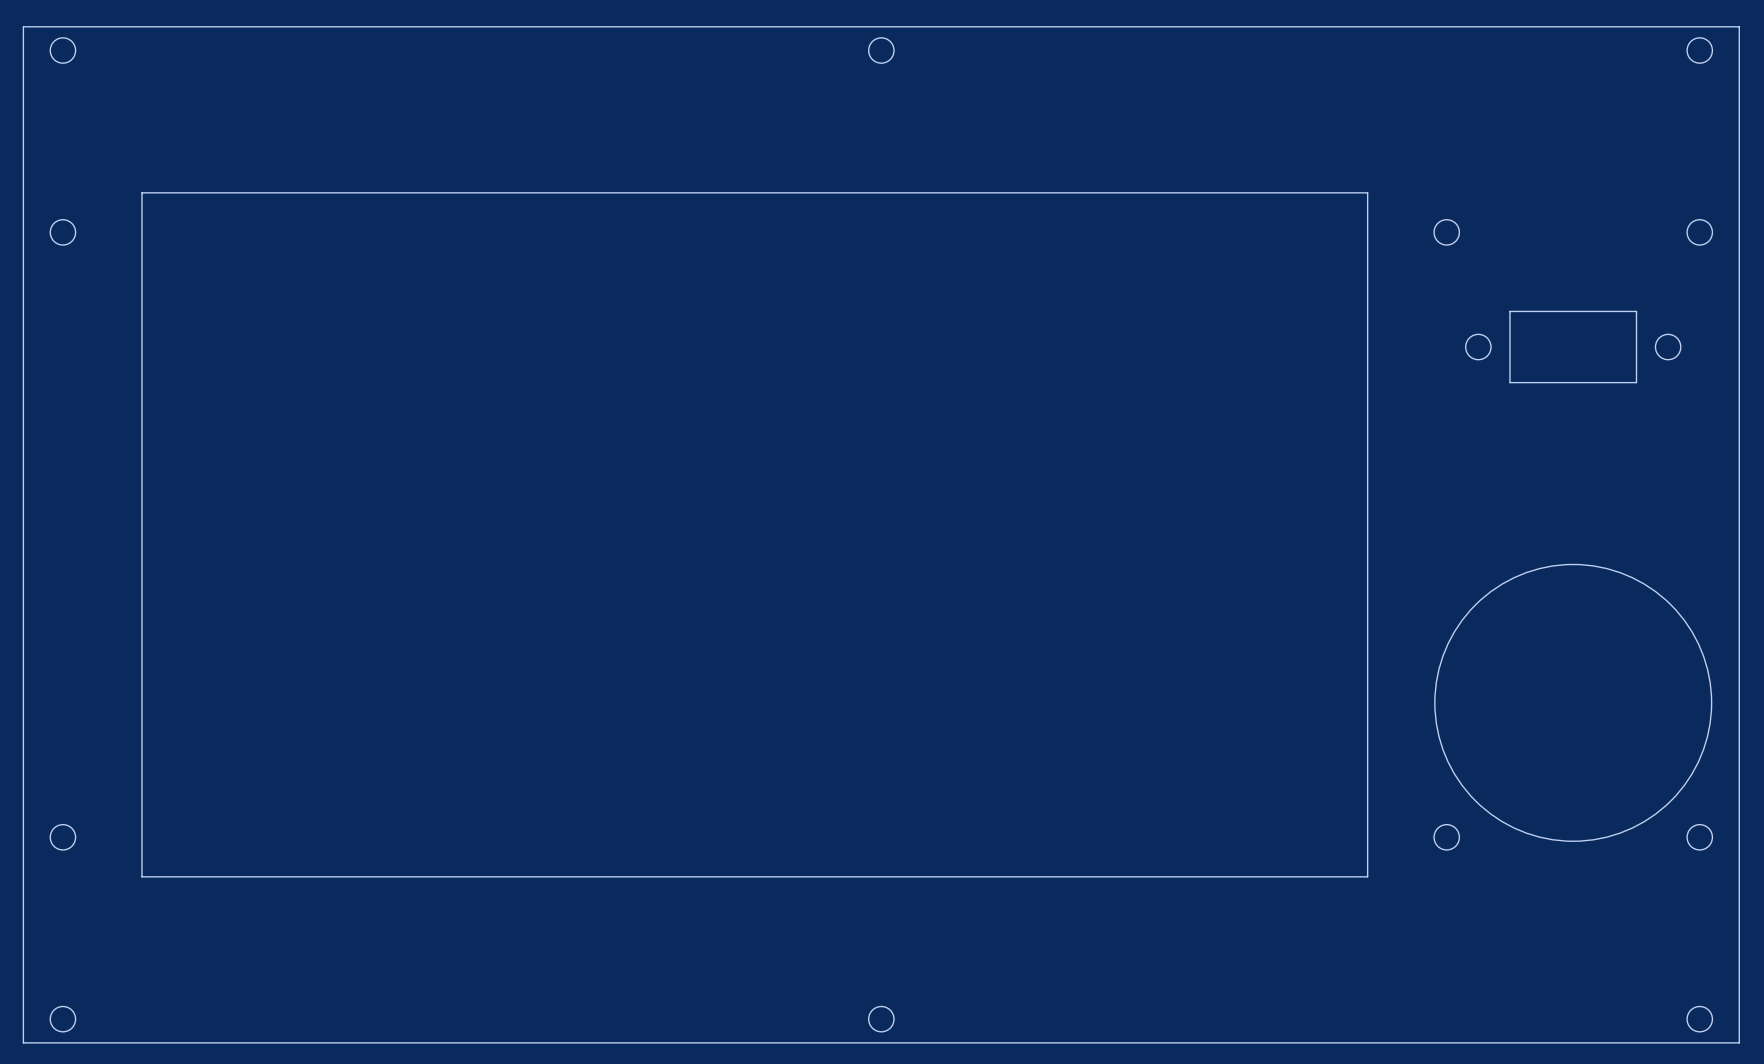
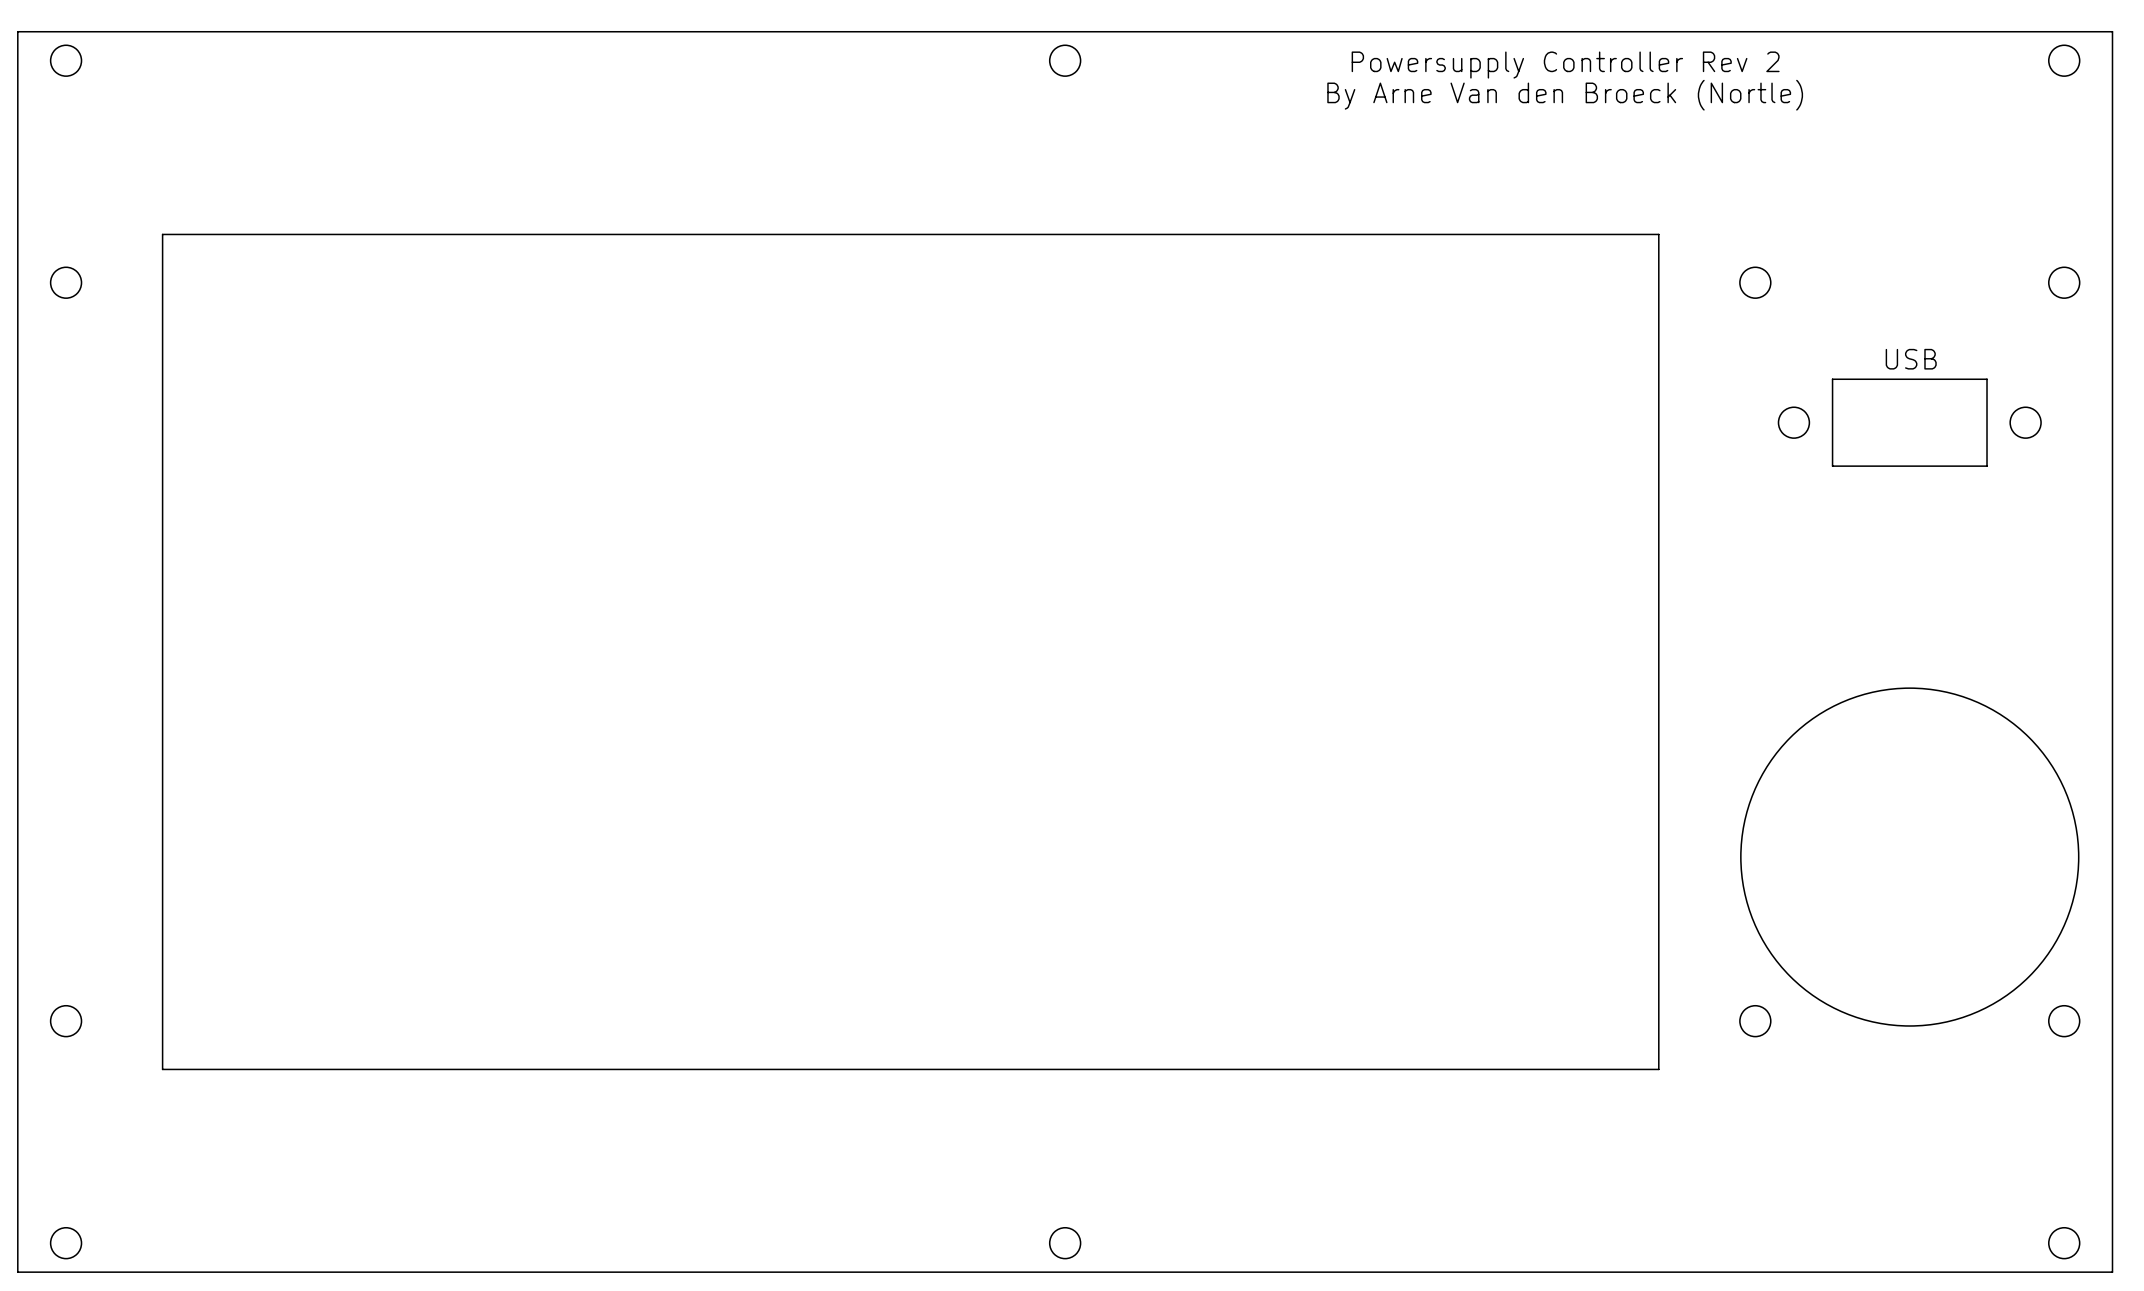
text: none -> Powersupply Controller Rev 2 (1565, 65)
text: none -> By Arne Van den Broeck (Nortle) (1565, 95)
text: none -> USB (1911, 359)

